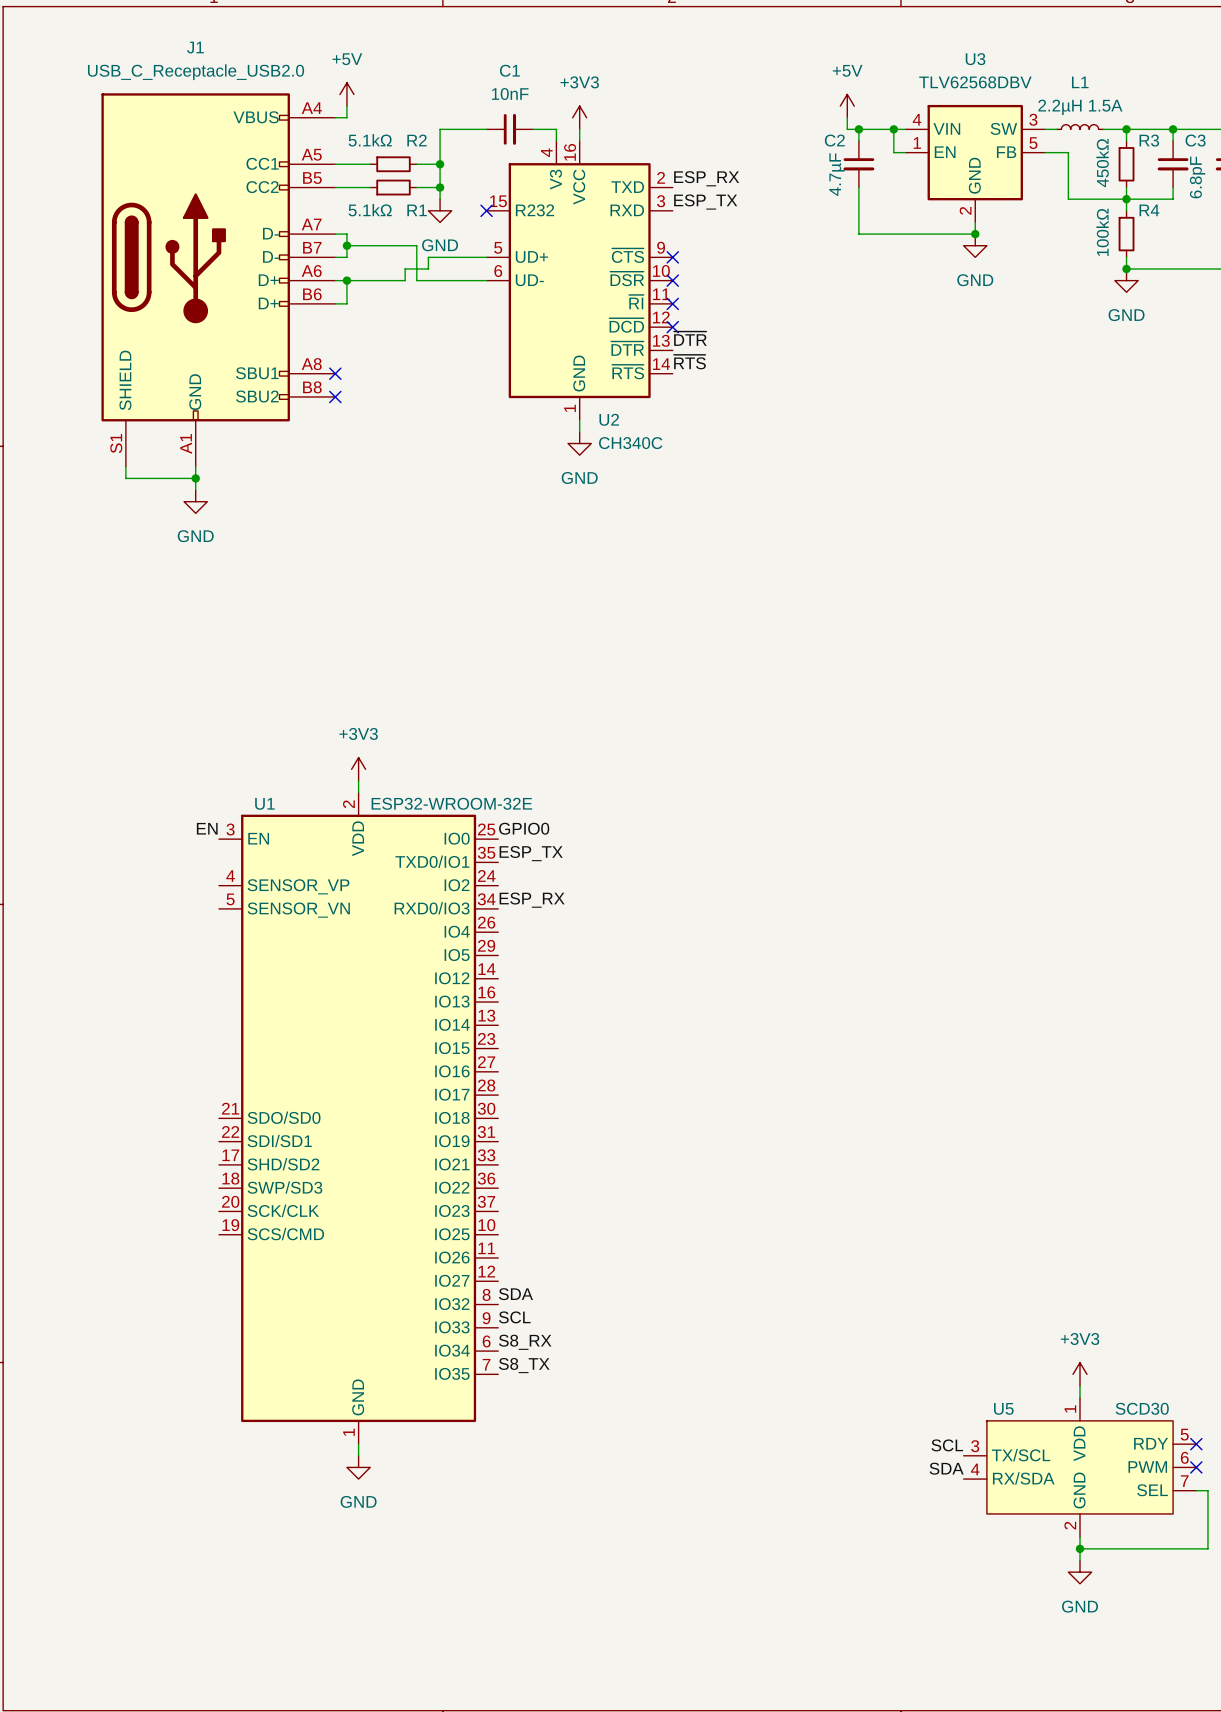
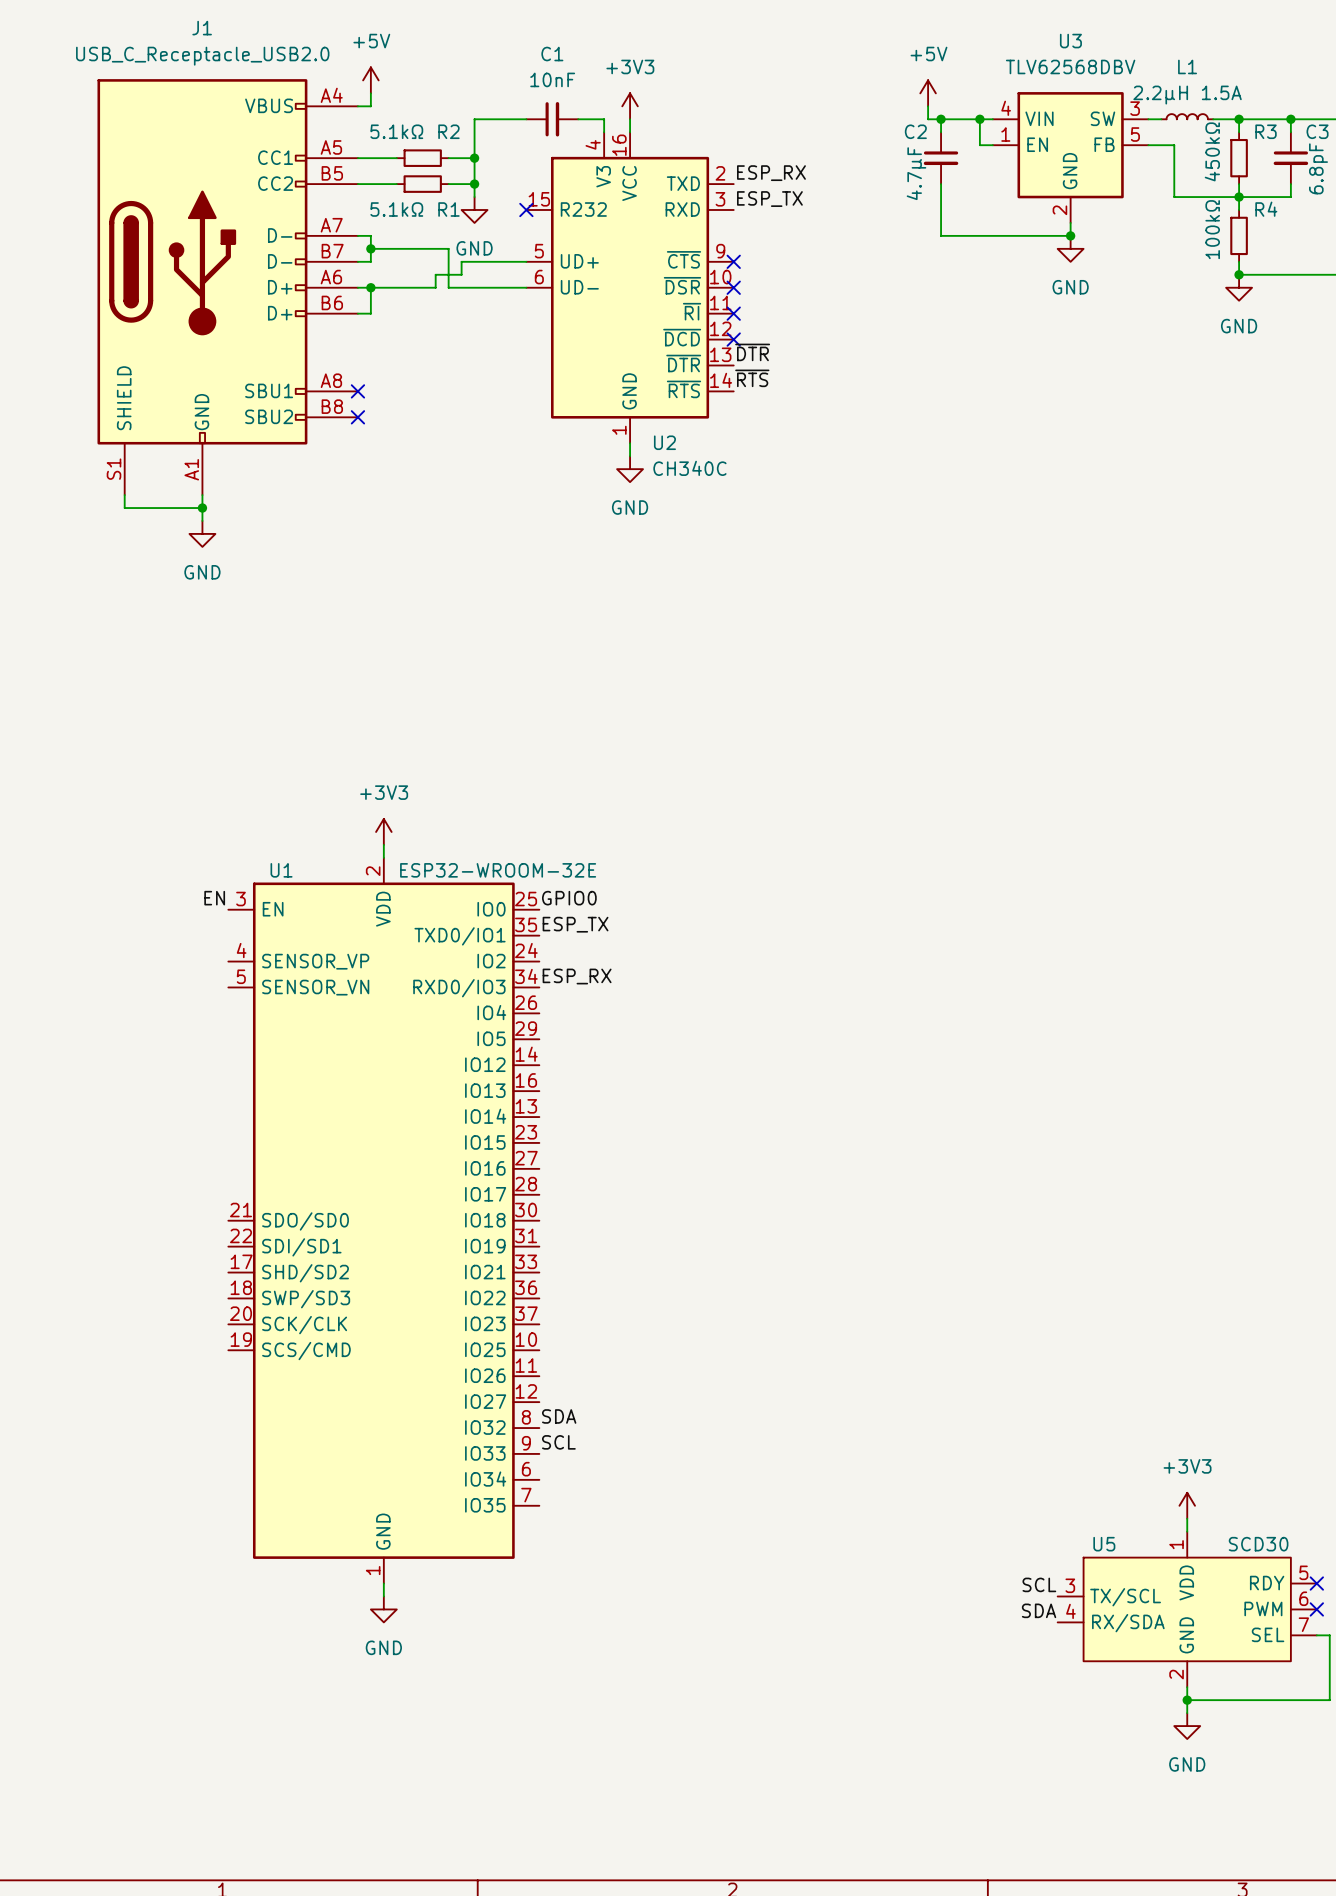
label: S8_RX (525, 1342) -> none
label: S8_TX (524, 1365) -> none

